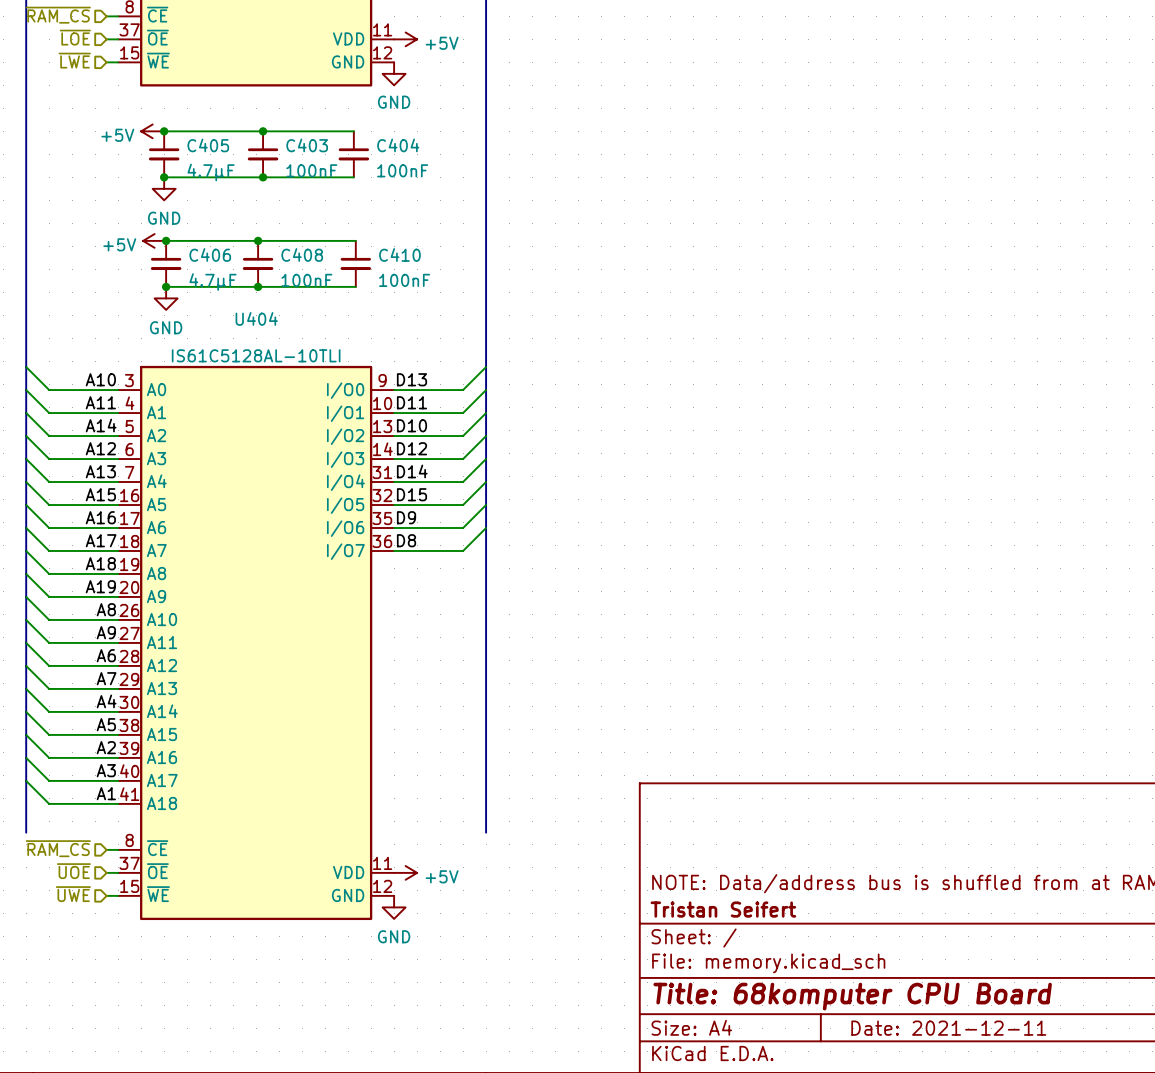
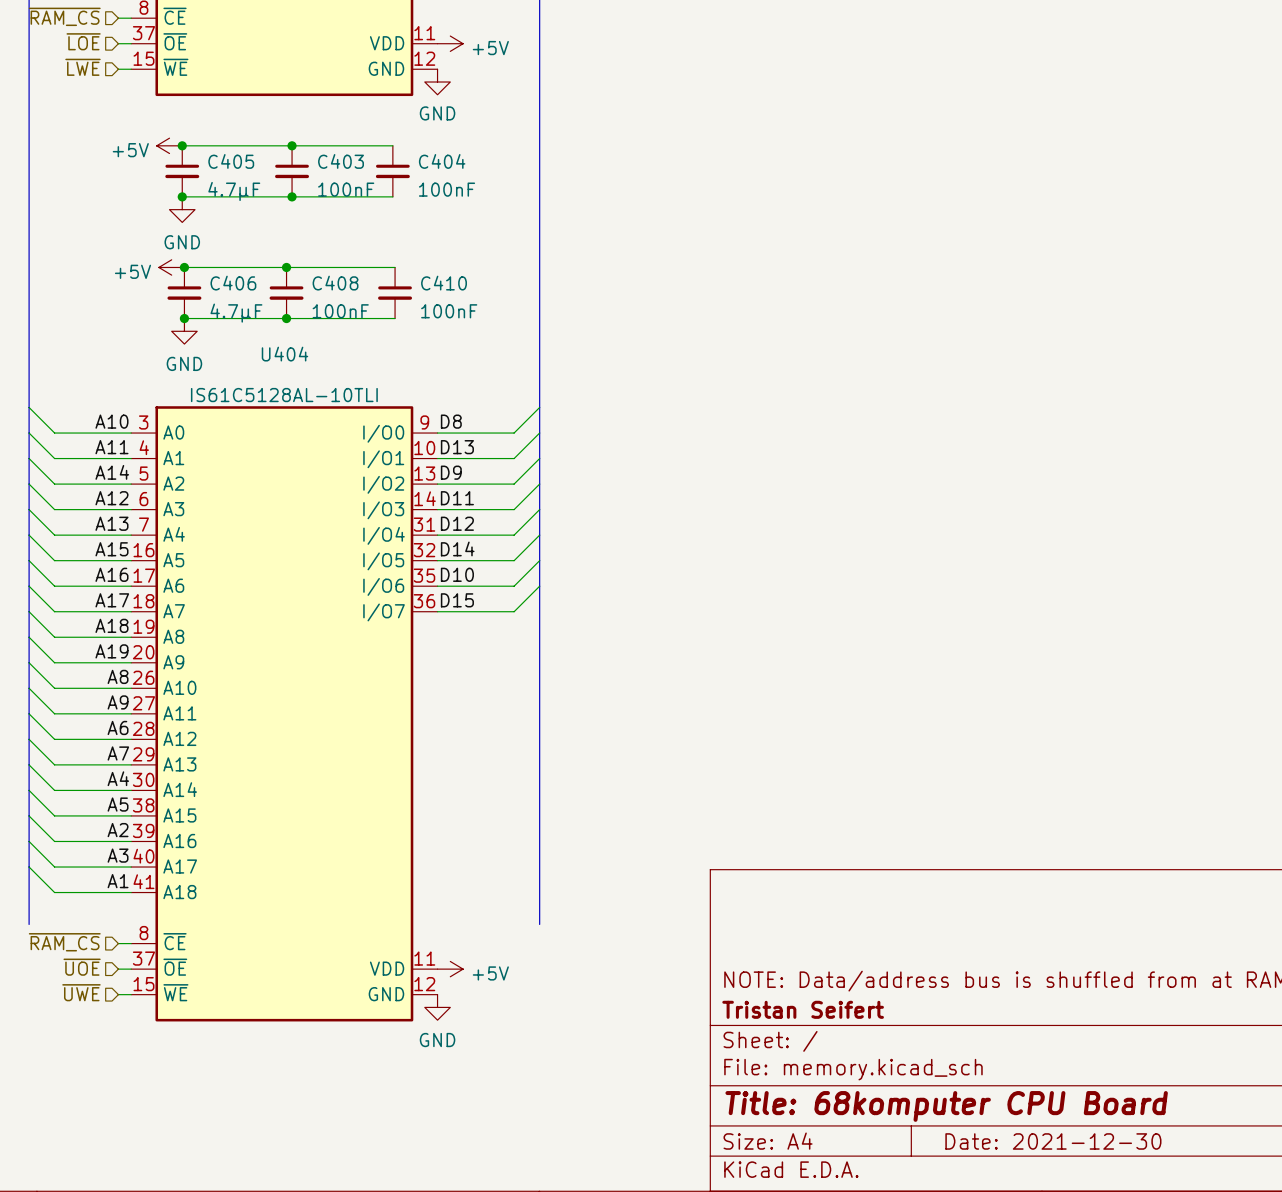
label: D13 (411, 379) -> D8 (451, 421)
label: D11 (411, 402) -> D13 (457, 447)
label: D10 (411, 425) -> D9 (451, 472)
label: D12 (411, 448) -> D11 (457, 498)
label: D14 (412, 471) -> D12 (457, 523)
label: D15 (411, 494) -> D14 (457, 548)
label: D9 (406, 517) -> D10 (457, 574)
label: D8 (406, 540) -> D15 (457, 600)
title block: Date: 2021-12-11 (948, 1028) -> Date: 2021-12-30 (1053, 1141)

